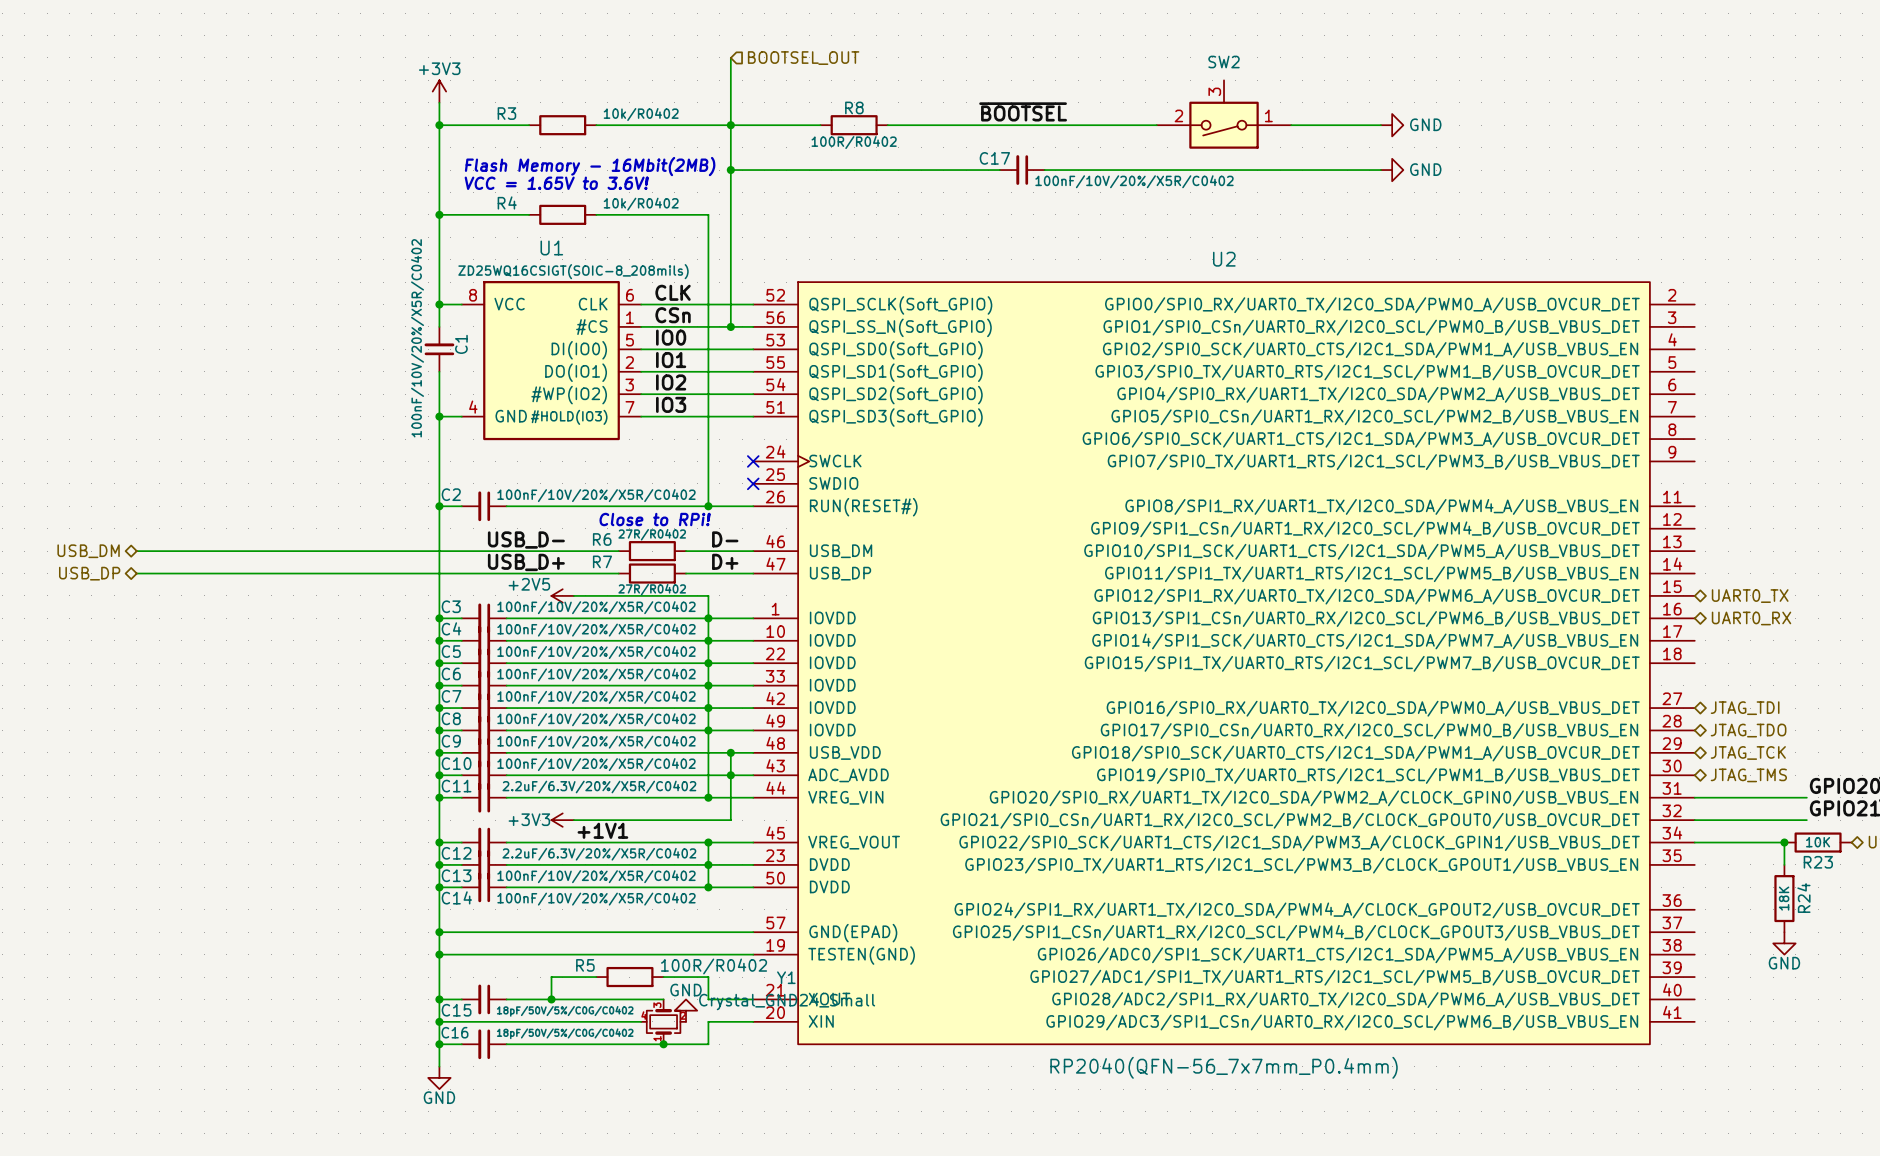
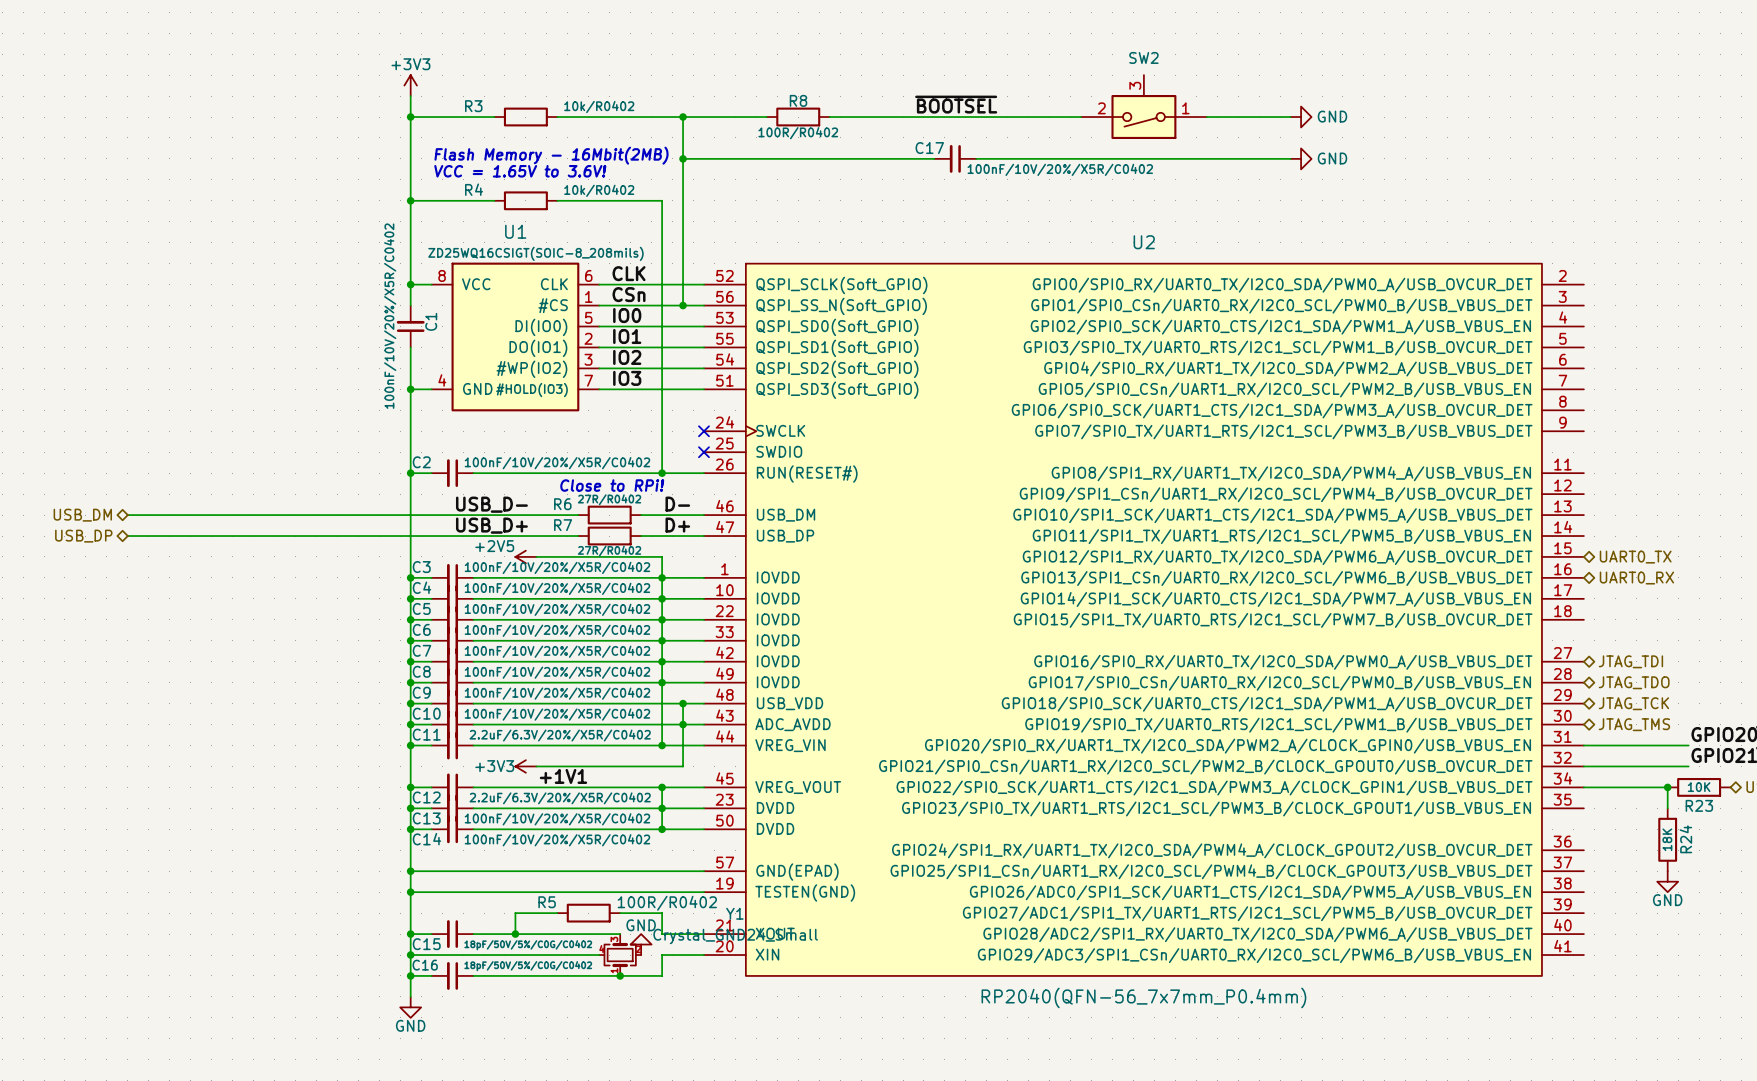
wire: (730, 57) (730, 125) -> none
hierarchical label: BOOTSEL_OUT (803, 58) -> none

